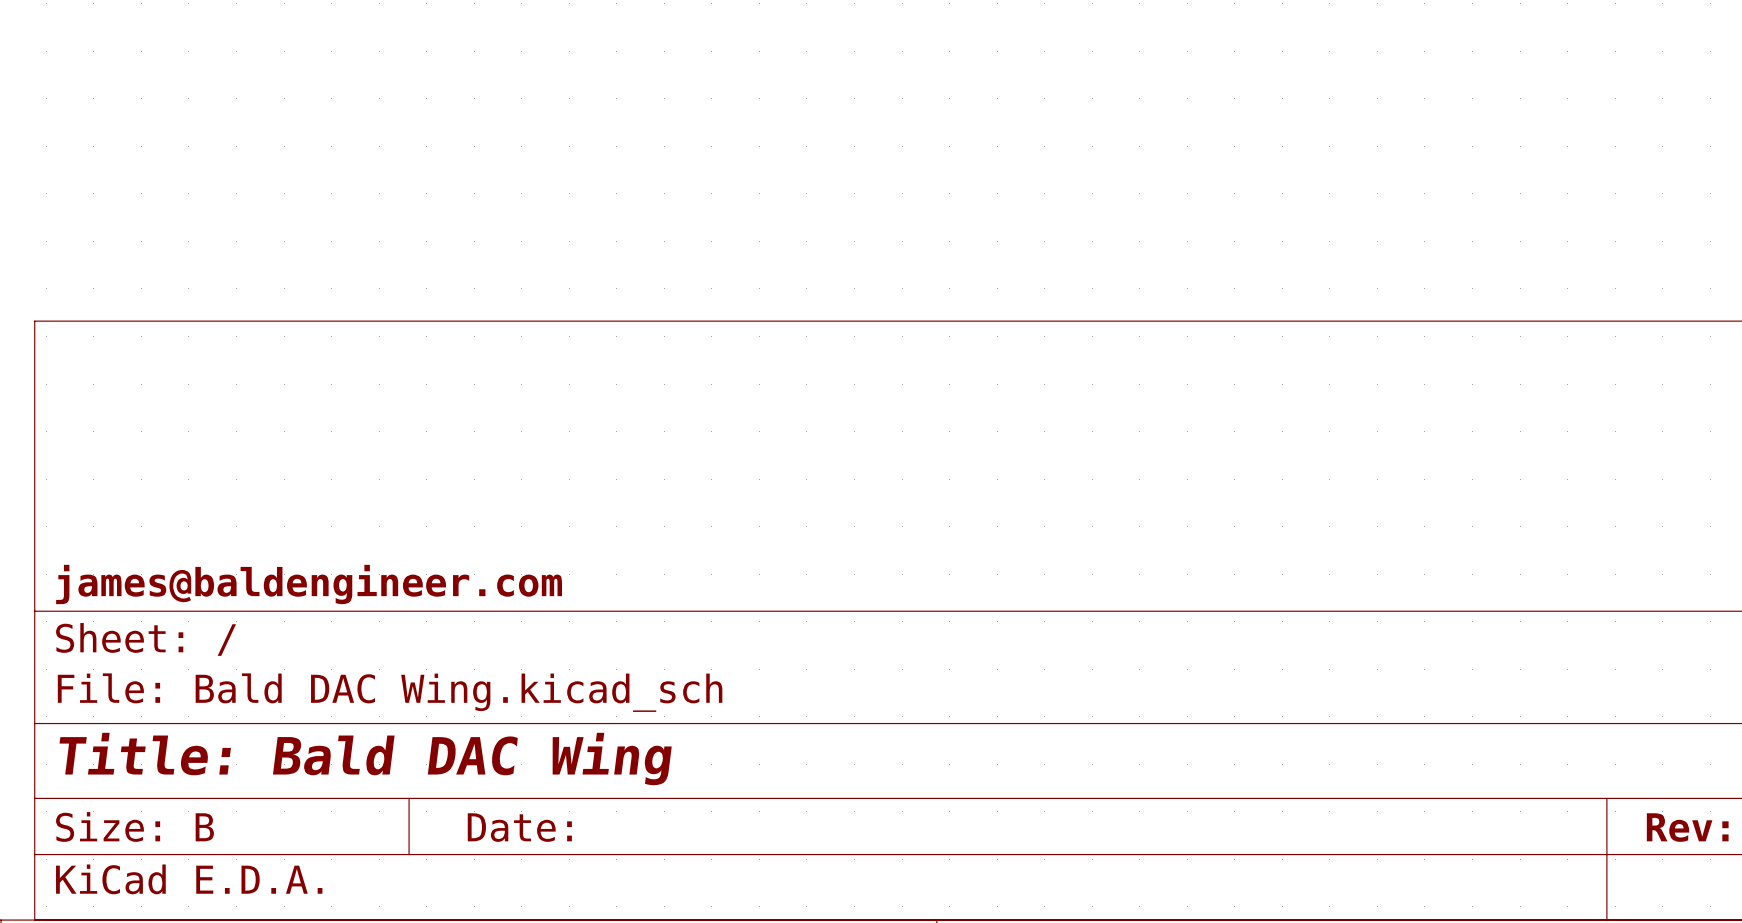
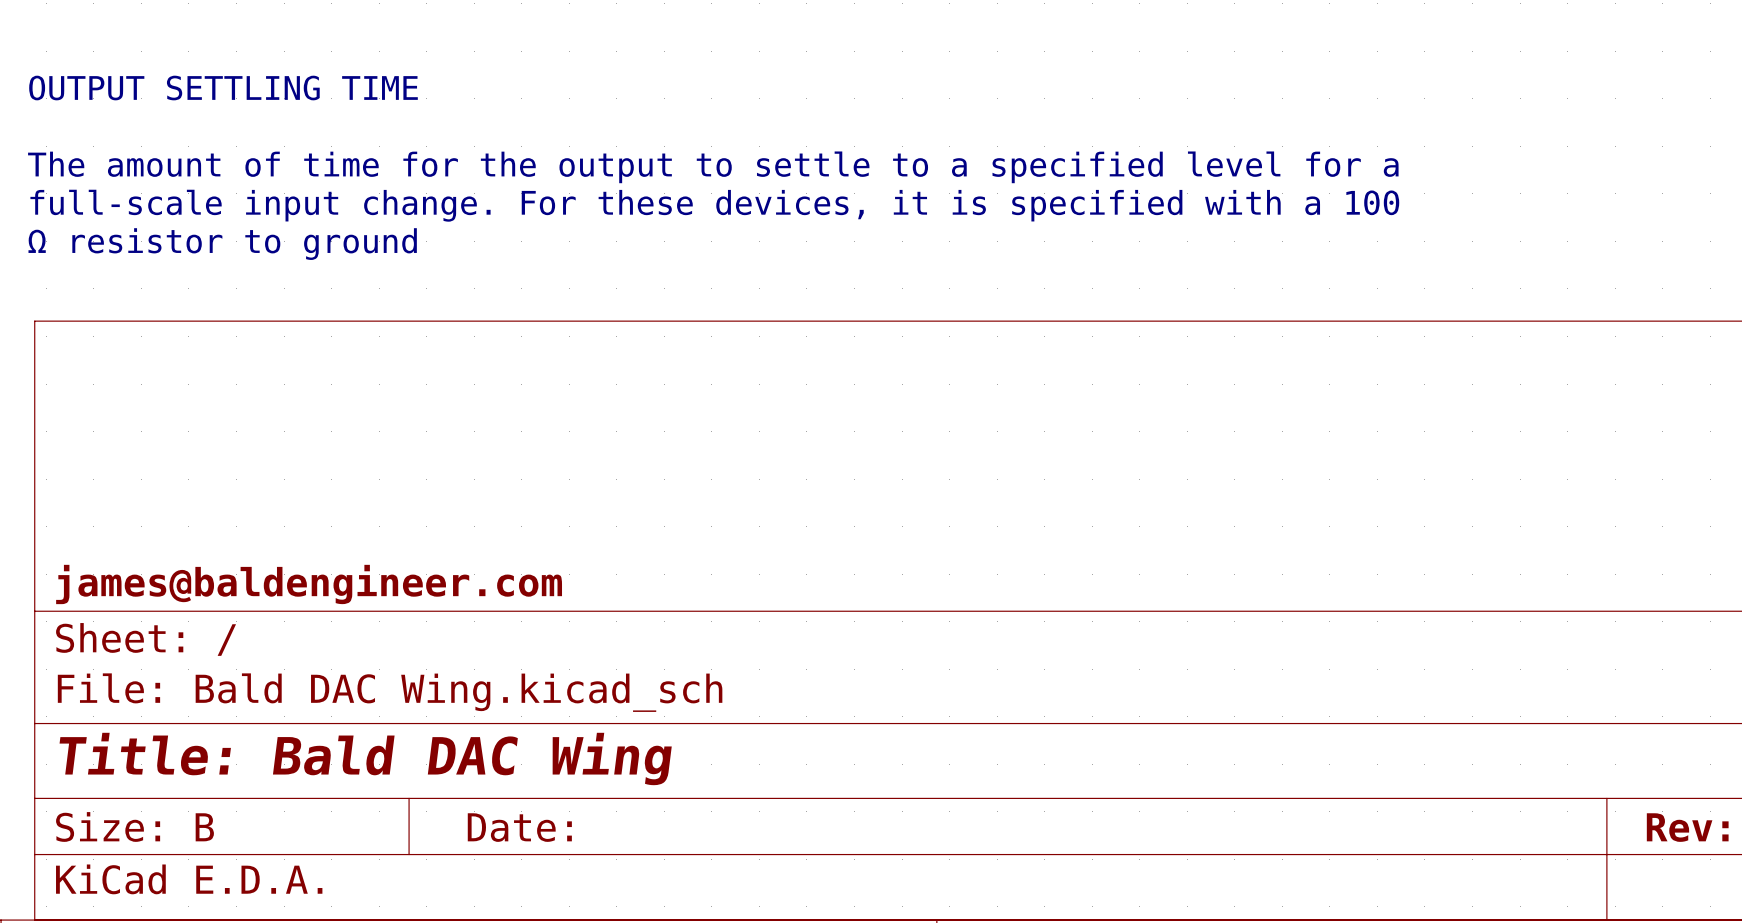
text: none -> OUTPUT SETTLING TIME (223, 88)
text: none -> The amount of time for the output to settle to a specified level for a (713, 167)
text: none -> full-scale input change. For these devices, it is specified with a 100 (714, 205)
text: none -> Ω resistor to ground (222, 244)

